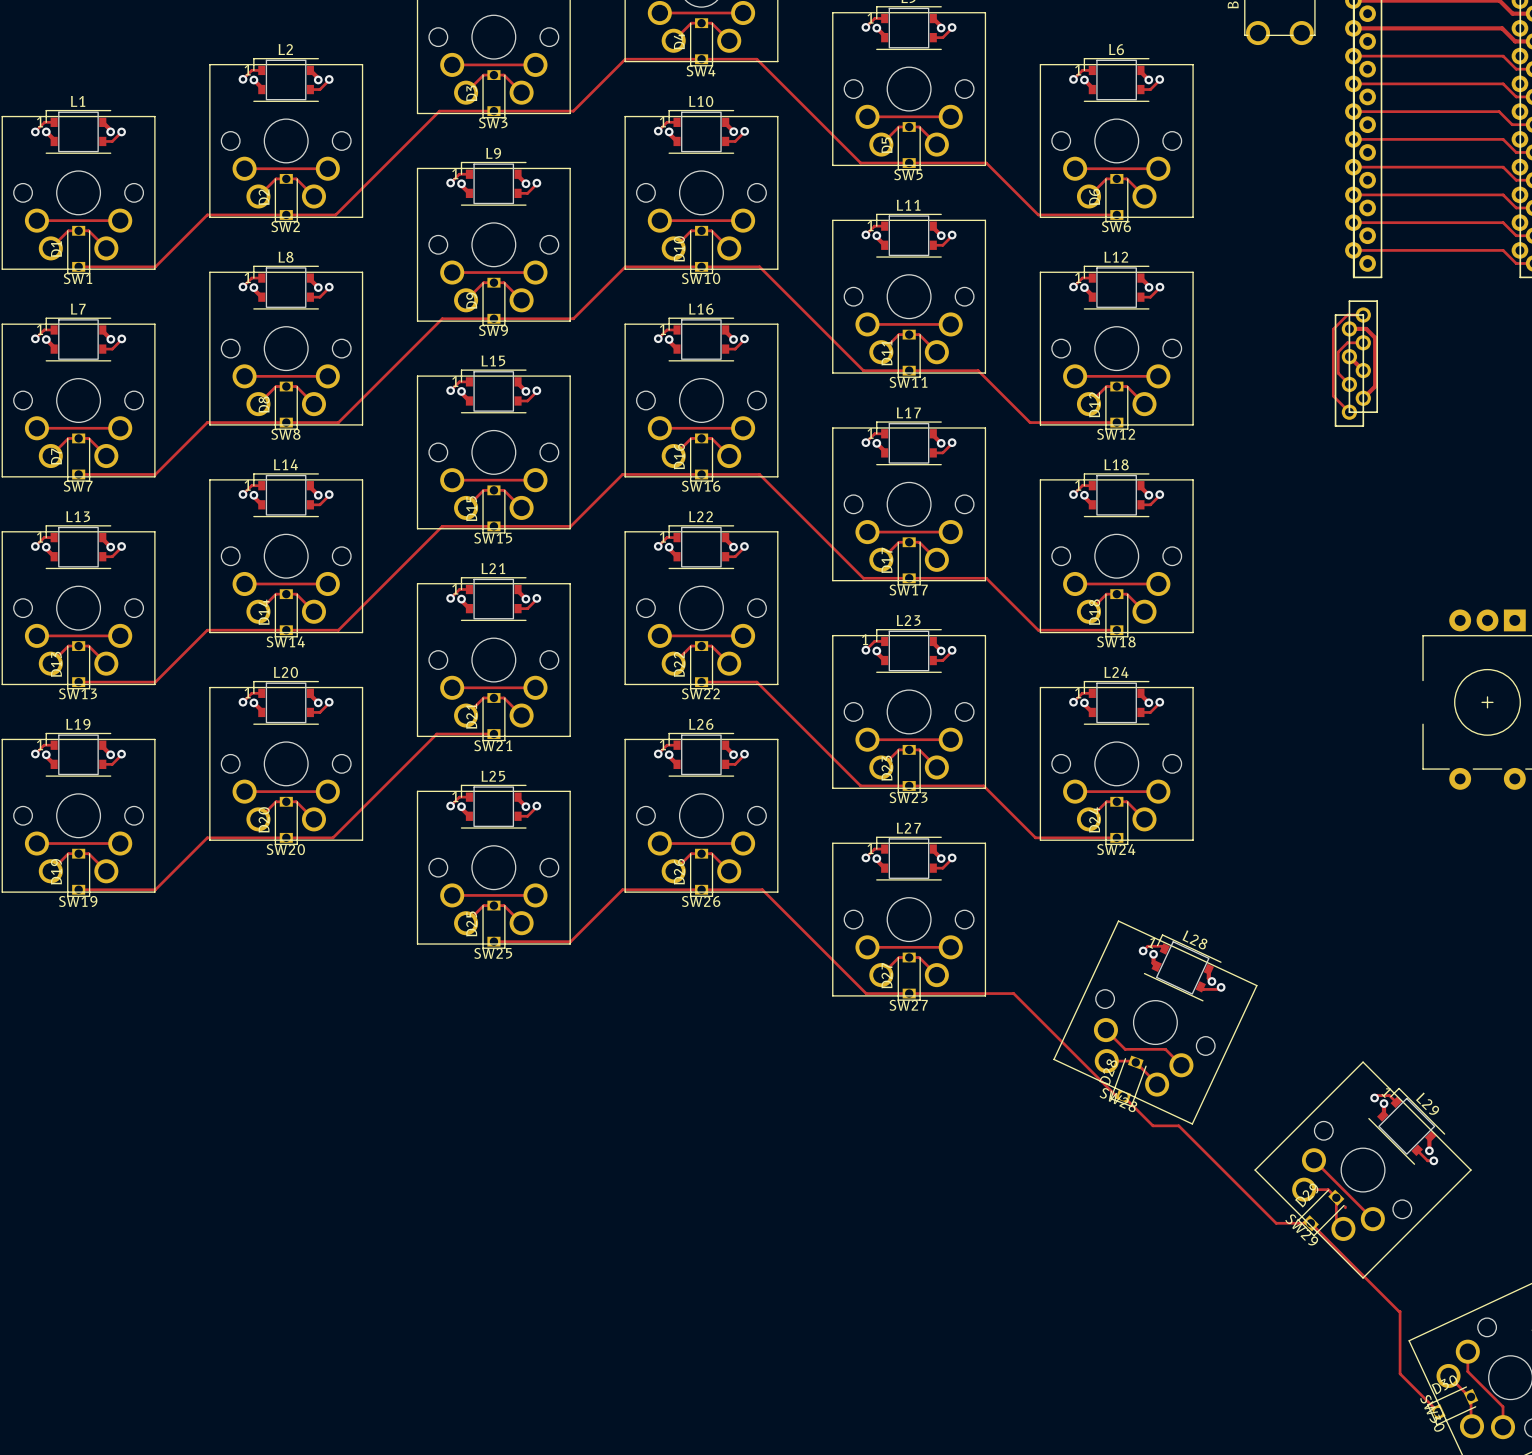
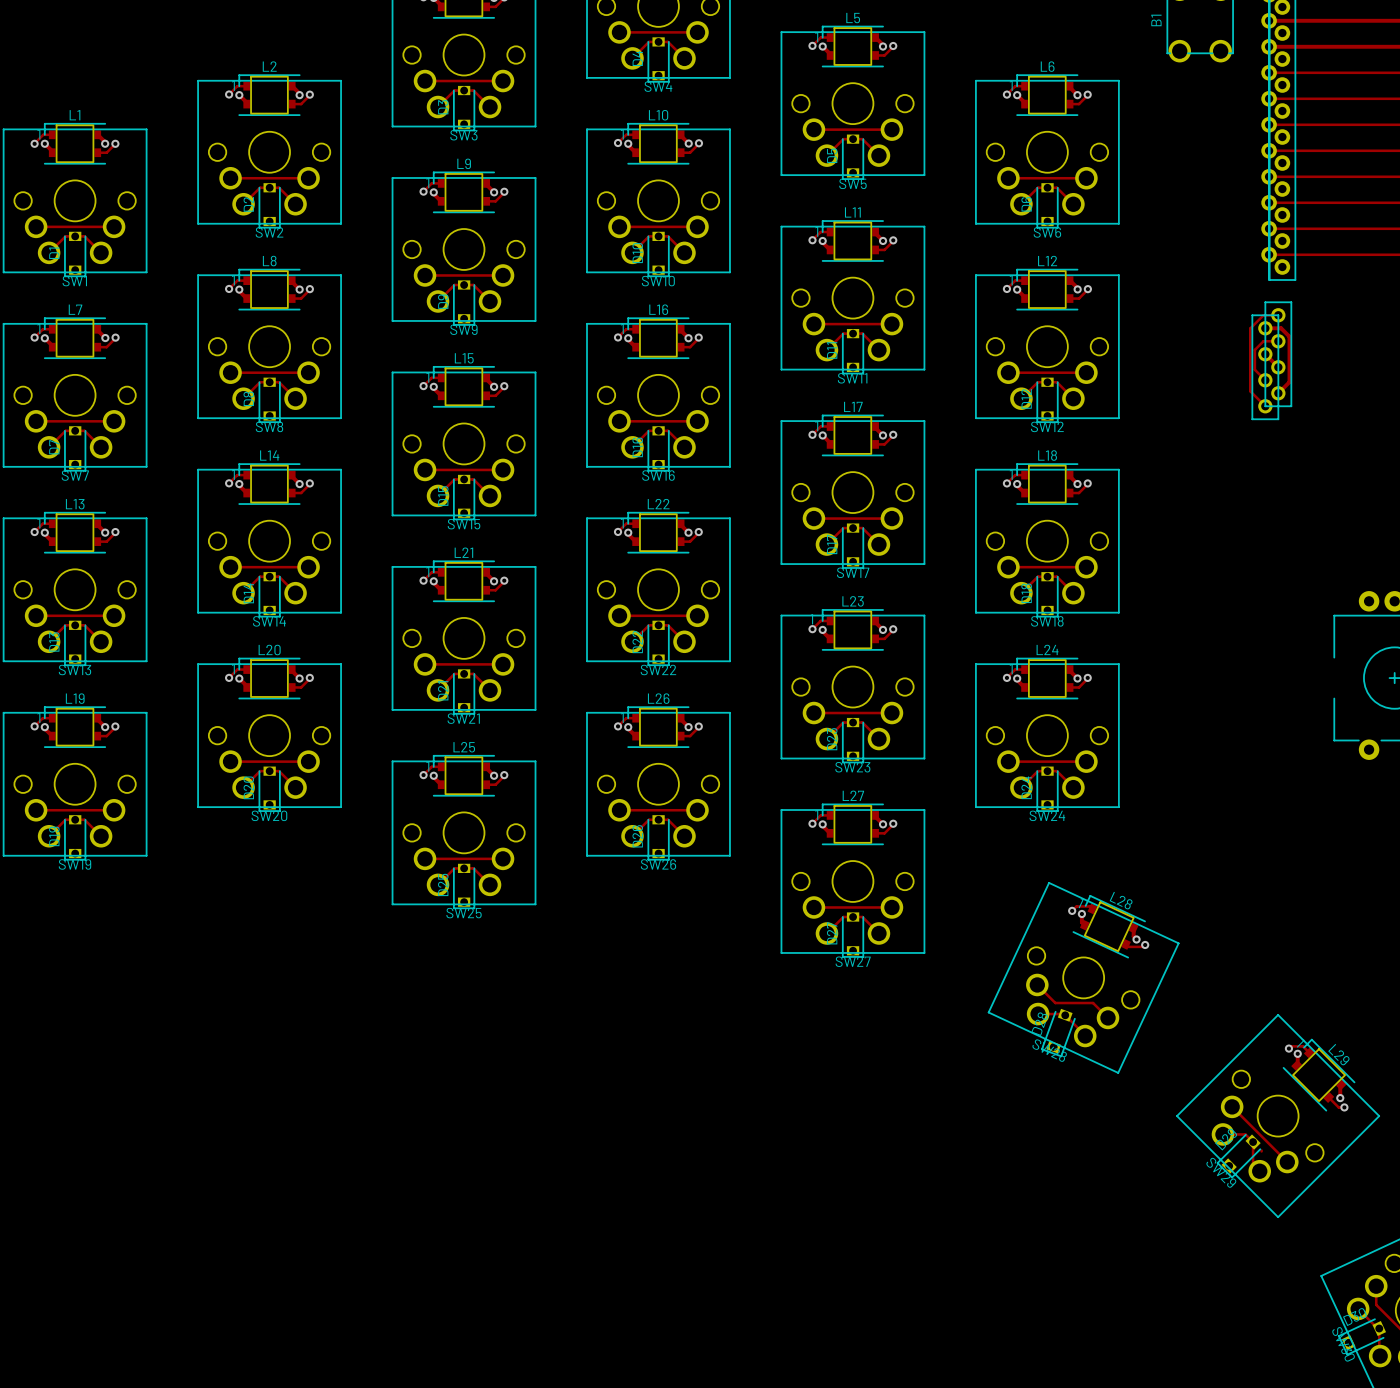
track: (1116, 214) (1038, 214) (986, 163) (860, 163) (756, 59) (625, 59) (573, 111) (439, 111) (335, 214) (207, 214) (155, 266) (78, 266) -> none
track: (1116, 422) (1030, 422) (978, 370) (863, 370) (759, 266) (625, 266) (573, 318) (442, 318) (338, 422) (207, 422) (155, 474) (78, 474) -> none
track: (1116, 630) (1038, 630) (986, 578) (863, 578) (759, 474) (622, 474) (570, 526) (442, 526) (338, 630) (207, 630) (155, 682) (78, 682) -> none
track: (701, 682) (756, 682) (860, 785) (983, 785) (1035, 837) (1116, 837) -> none
track: (493, 734) (436, 734) (333, 837) (207, 837) (155, 889) (78, 889) -> none
track: (493, 941) (570, 941) (622, 889) (762, 889) (866, 993) (1013, 993) (1116, 1096) (1123, 1096) (1152, 1125) (1178, 1125) (1276, 1223) (1310, 1223) (1400, 1311) (1400, 1373) (1438, 1412) -> none

